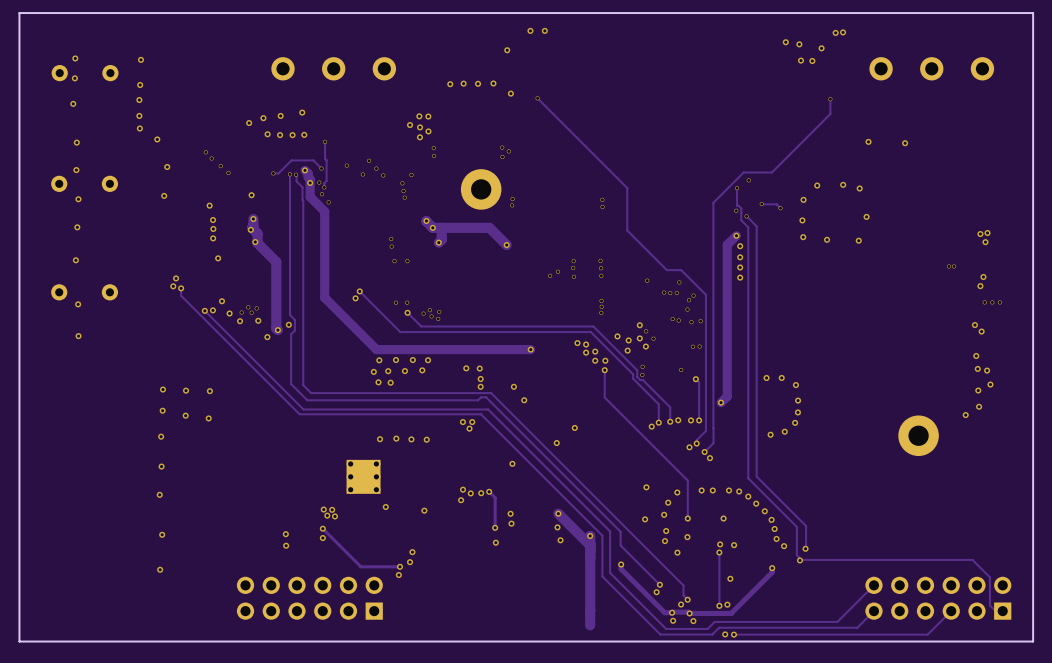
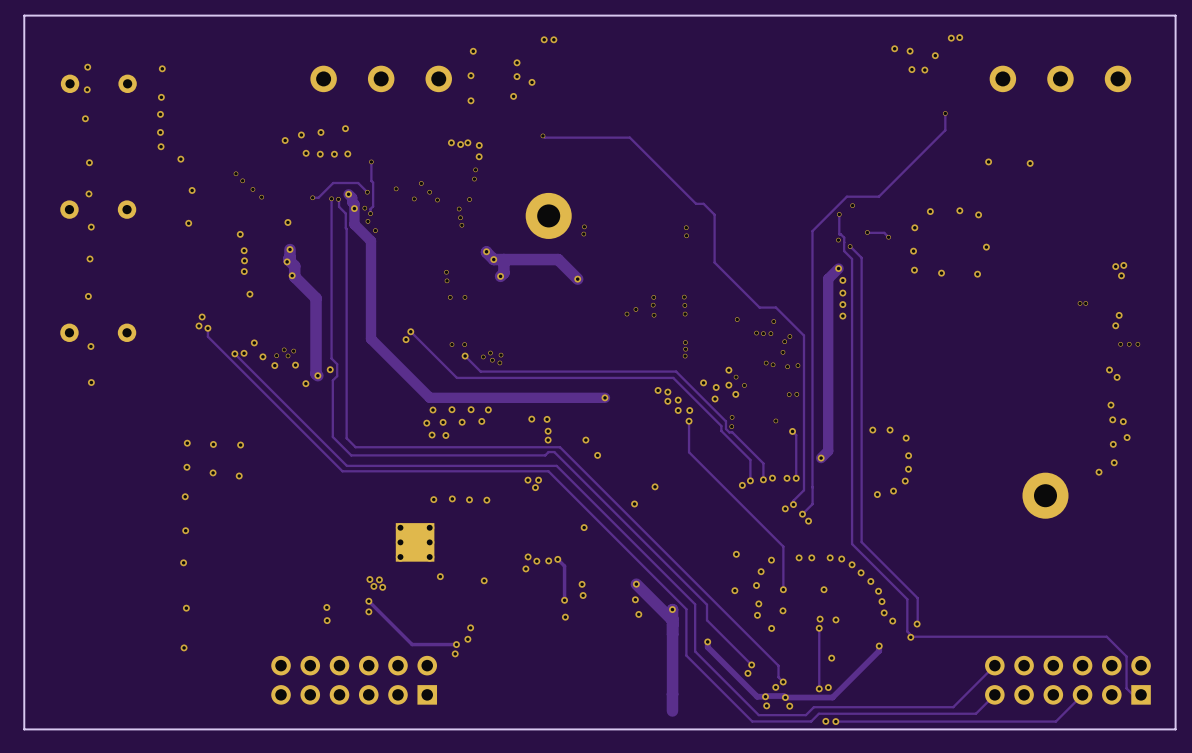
via: (530, 30) -> none
via: (544, 30) -> none
via: none -> (544, 39)
via: none -> (553, 39)
via: none -> (473, 51)
via: (507, 50) -> none
via: none -> (517, 62)
via: none -> (470, 75)
via: none -> (517, 76)
via: none -> (532, 82)
via: (463, 83) -> none
via: (478, 83) -> none
via: (493, 83) -> none
via: none -> (470, 100)
via: (510, 93) -> none
track: (537, 98) (627, 188) -> (542, 135) (544, 137) (629, 137) (696, 203) (703, 203) (714, 214)
via: (537, 98) -> none
via: (419, 116) -> none
via: (428, 116) -> none
via: none -> (542, 135)
via: none -> (451, 142)
via: none -> (460, 144)
via: (428, 131) -> none
via: (502, 147) -> none
via: none -> (475, 169)
via: (433, 148) -> none
via: (508, 151) -> none
via: (434, 155) -> none
via: none -> (474, 179)
via: (502, 156) -> none

